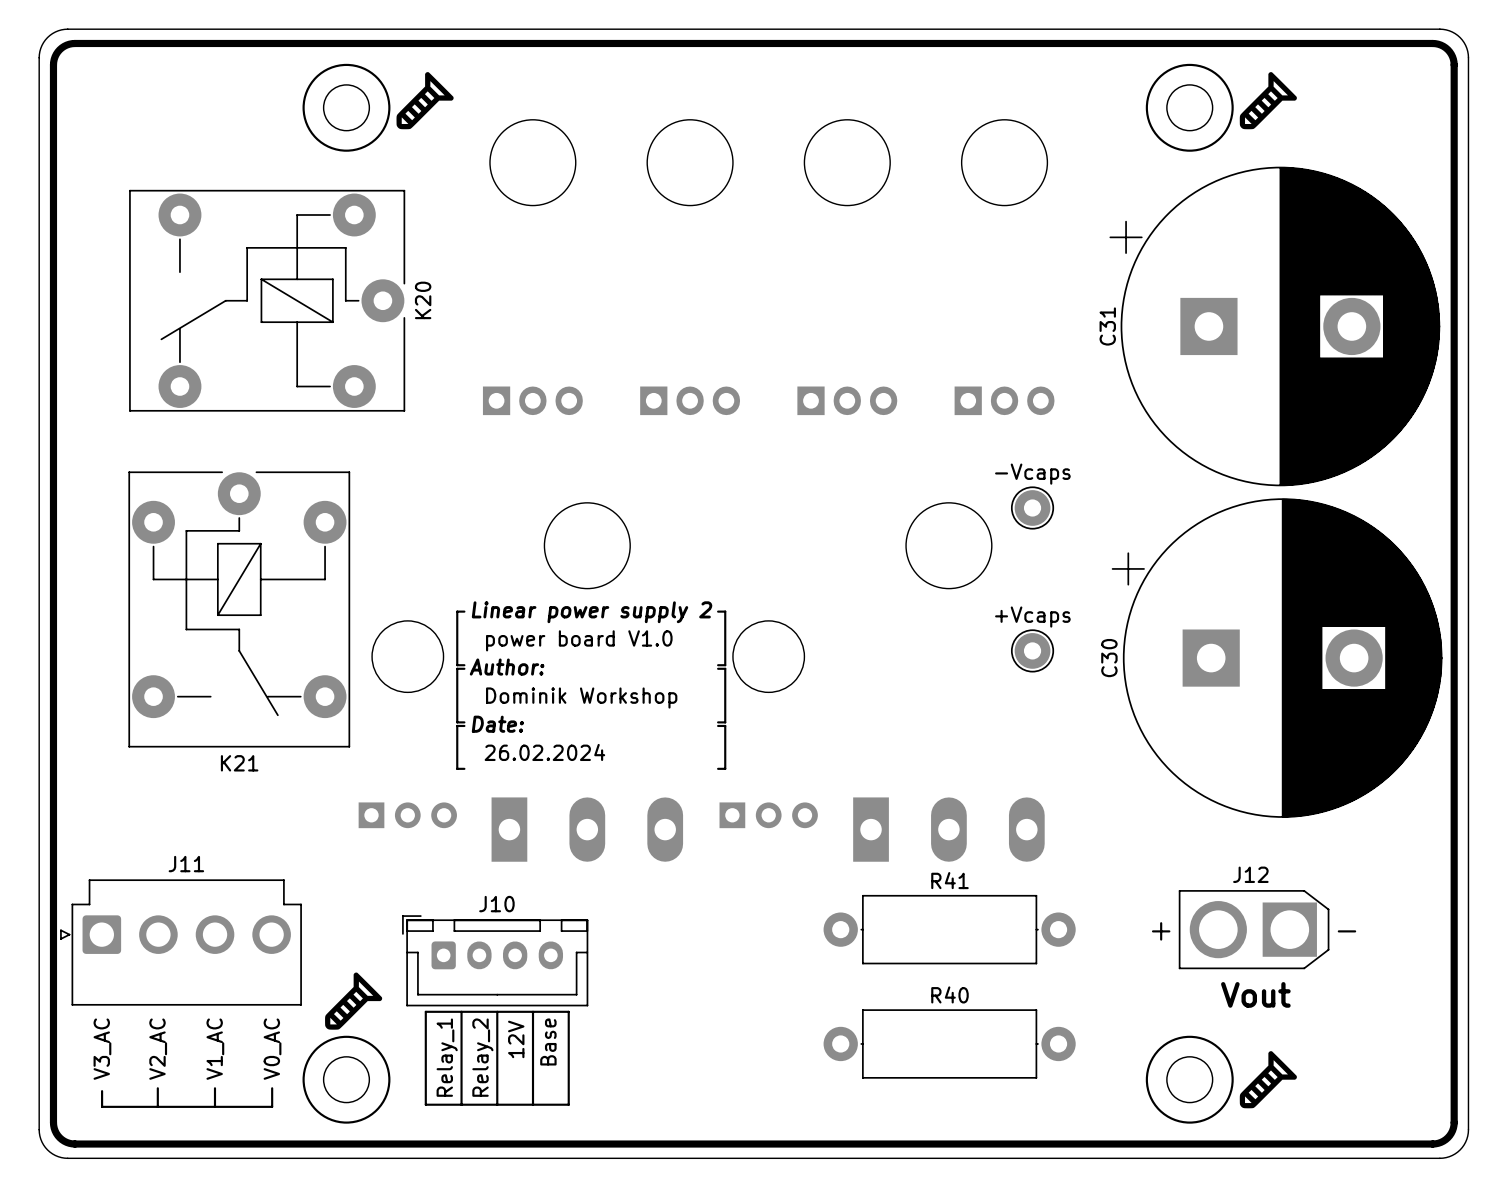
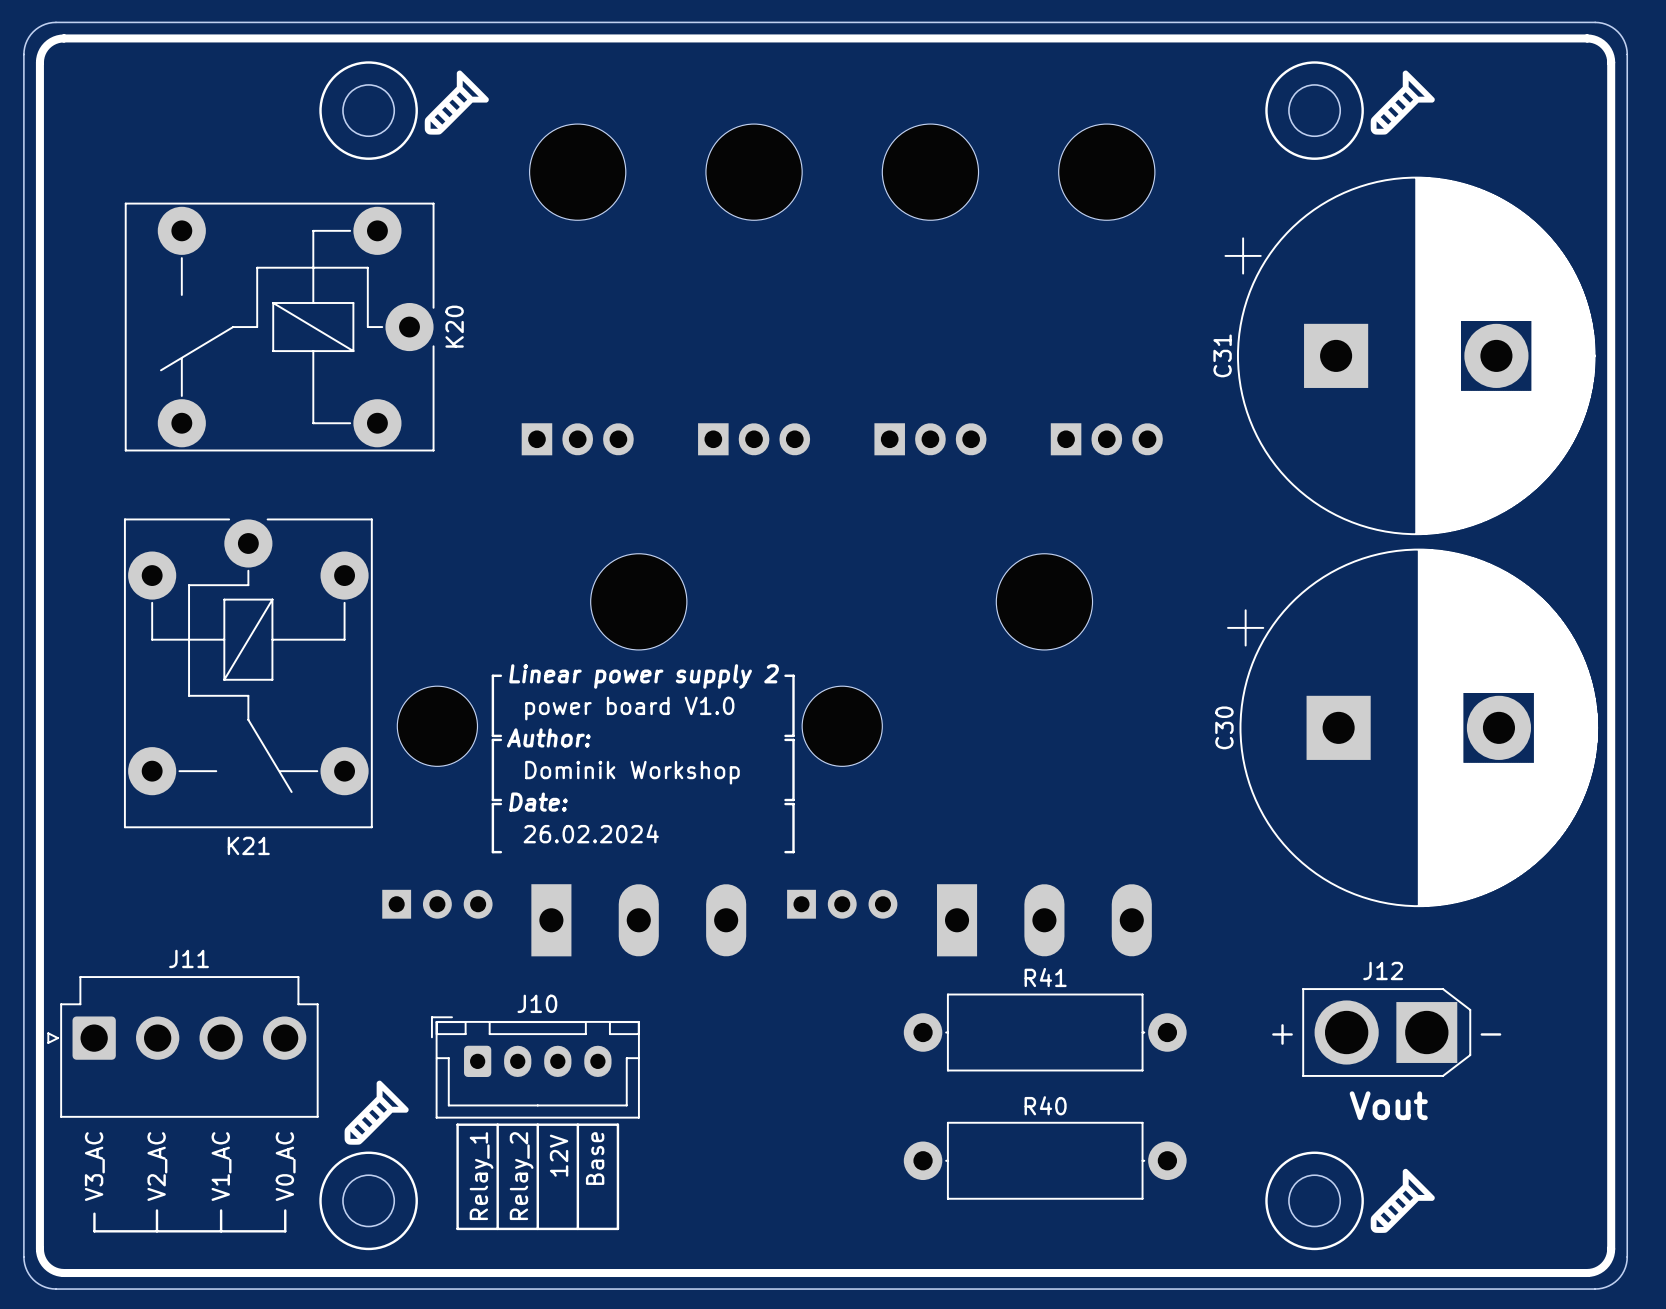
-Vcaps: (1032, 507) -> none
+Vcaps: (1032, 650) -> none

